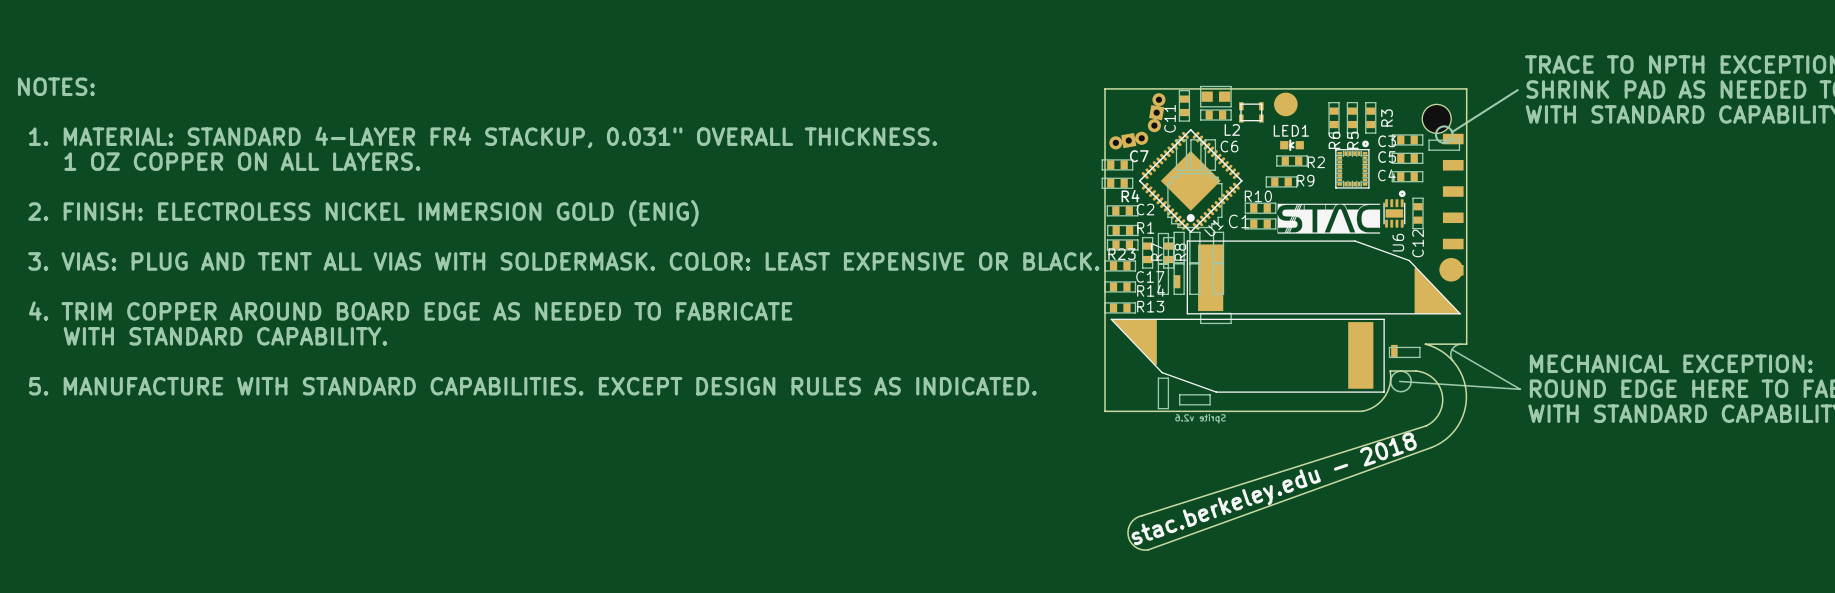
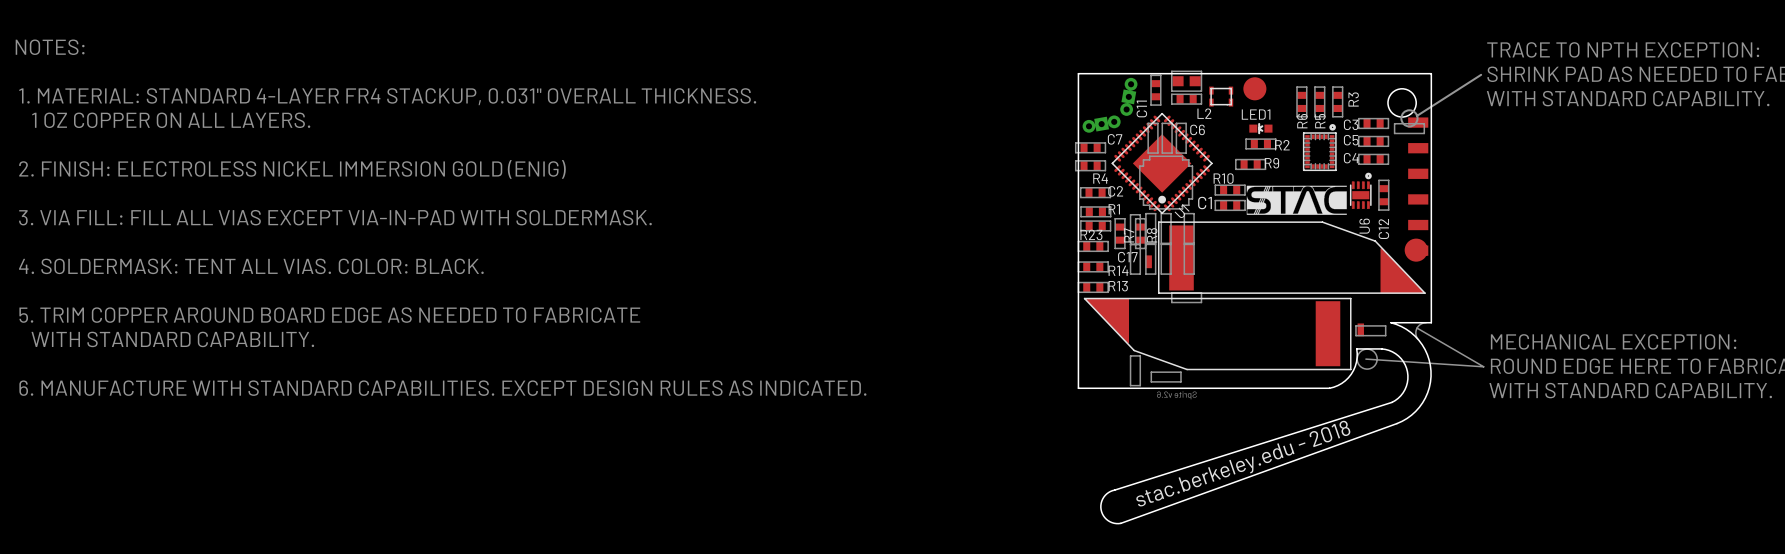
text position: NOTES: (56, 86) -> NOTES: (50, 47)
text: none -> 1. MATERIAL: STANDARD 4-LAYER FR4 STACKUP, 0.031" OVERALL THICKNESS. (387, 96)
text: 1. MATERIAL: STANDARD 4-LAYER FR4 STACKUP, 0.031" OVERALL THICKNESS. (483, 137) -> 1 OZ COPPER ON ALL LAYERS. (171, 120)
text: 1 OZ COPPER ON ALL LAYERS. (242, 161) -> none
text position: 2. FINISH: ELECTROLESS NICKEL IMMERSION GOLD (ENIG) (363, 213) -> 2. FINISH: ELECTROLESS NICKEL IMMERSION GOLD (ENIG) (292, 169)
text: none -> 3. VIA FILL: FILL ALL VIAS EXCEPT VIA-IN-PAD WITH SOLDERMASK. (335, 217)
text: 3. VIAS: PLUG AND TENT ALL VIAS WITH SOLDERMASK. COLOR: LEAST EXPENSIVE OR BLACK. (563, 261) -> none
text: none -> 4. SOLDERMASK: TENT ALL VIAS. COLOR: BLACK. (251, 266)
text: 4. TRIM COPPER AROUND BOARD EDGE AS NEEDED TO FABRICATE (410, 311) -> none
text: WITH STANDARD CAPABILITY. (225, 336) -> 5. TRIM COPPER AROUND BOARD EDGE AS NEEDED TO FABRICATE (329, 315)
text: none -> WITH STANDARD CAPABILITY. (172, 339)
text: 5. MANUFACTURE WITH STANDARD CAPABILITIES. EXCEPT DESIGN RULES AS INDICATED. (532, 386) -> 6. MANUFACTURE WITH STANDARD CAPABILITIES. EXCEPT DESIGN RULES AS INDICATED. (442, 388)

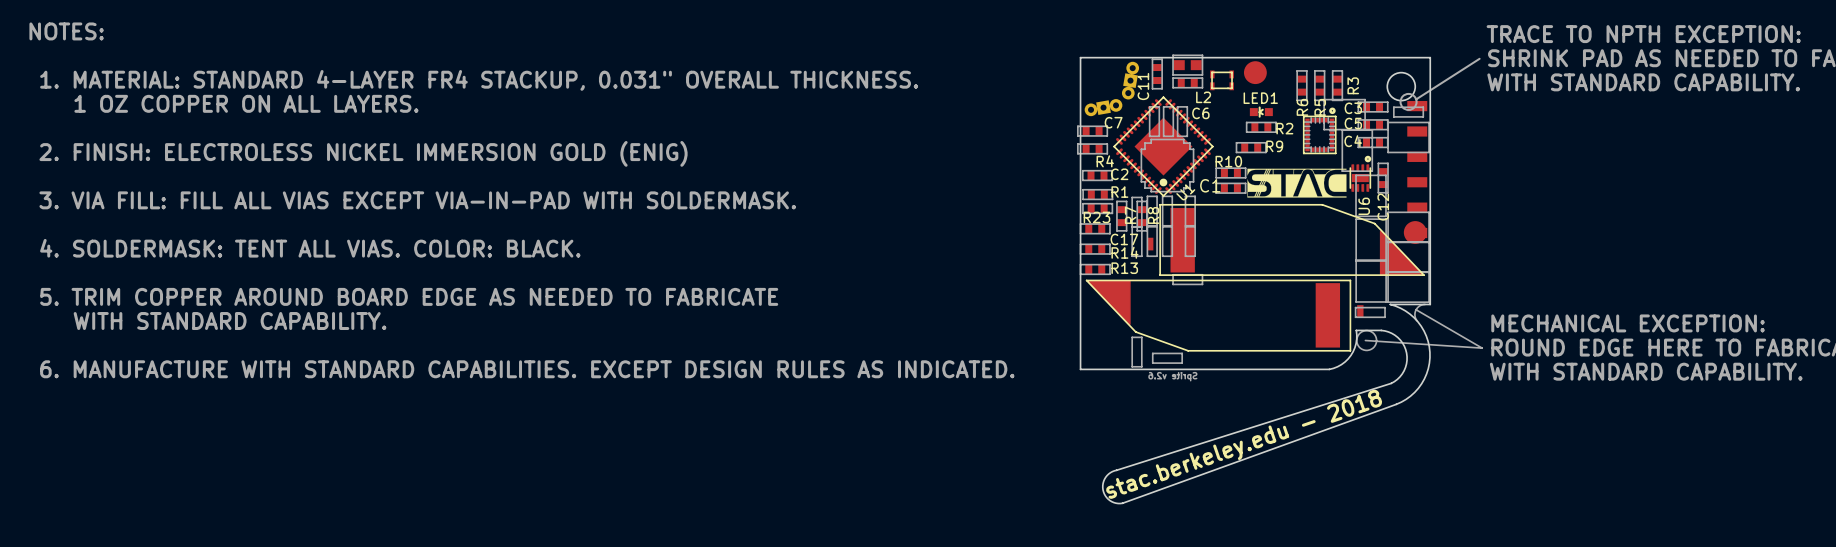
part: none -> (1344, 114)
part: none -> (1408, 137)
part: none -> (1357, 150)
part: none -> (1371, 195)
part: none -> (1408, 227)
part: none -> (1371, 239)
part: none -> (1408, 257)
part: none -> (1371, 281)
part: none -> (1408, 287)

